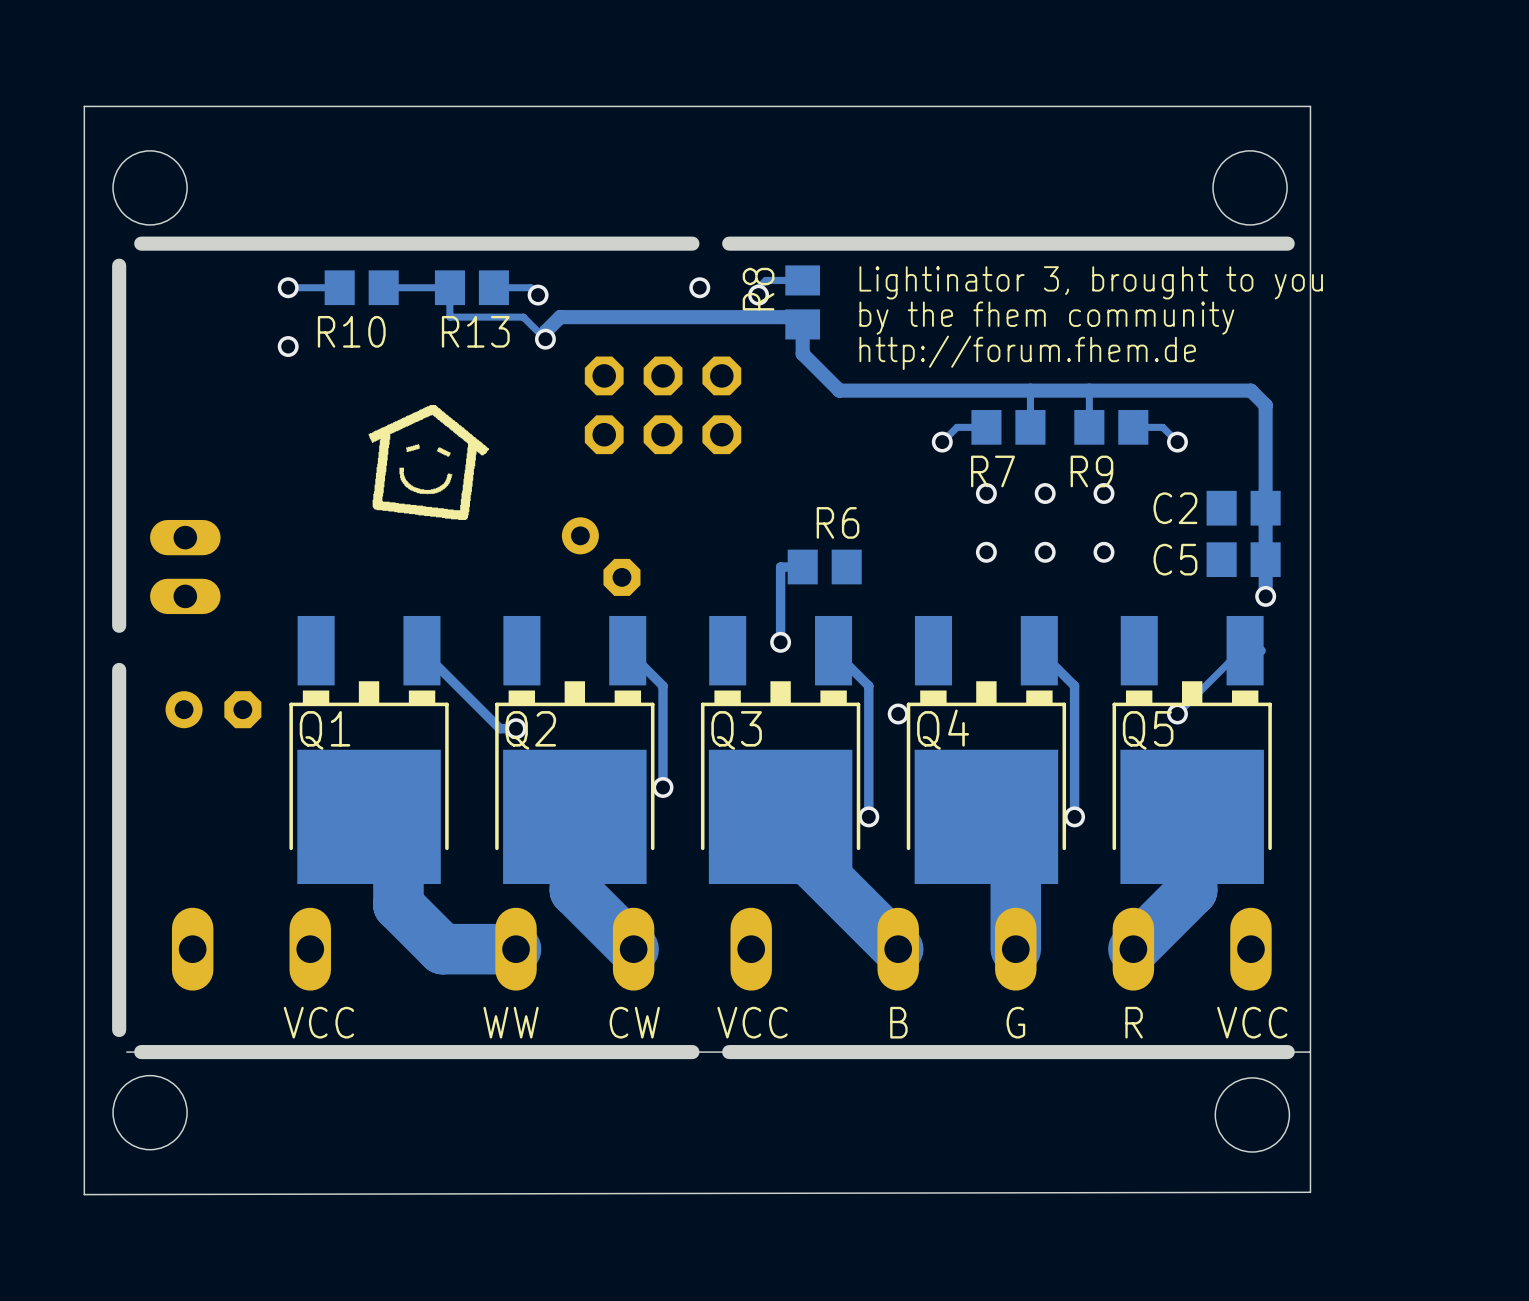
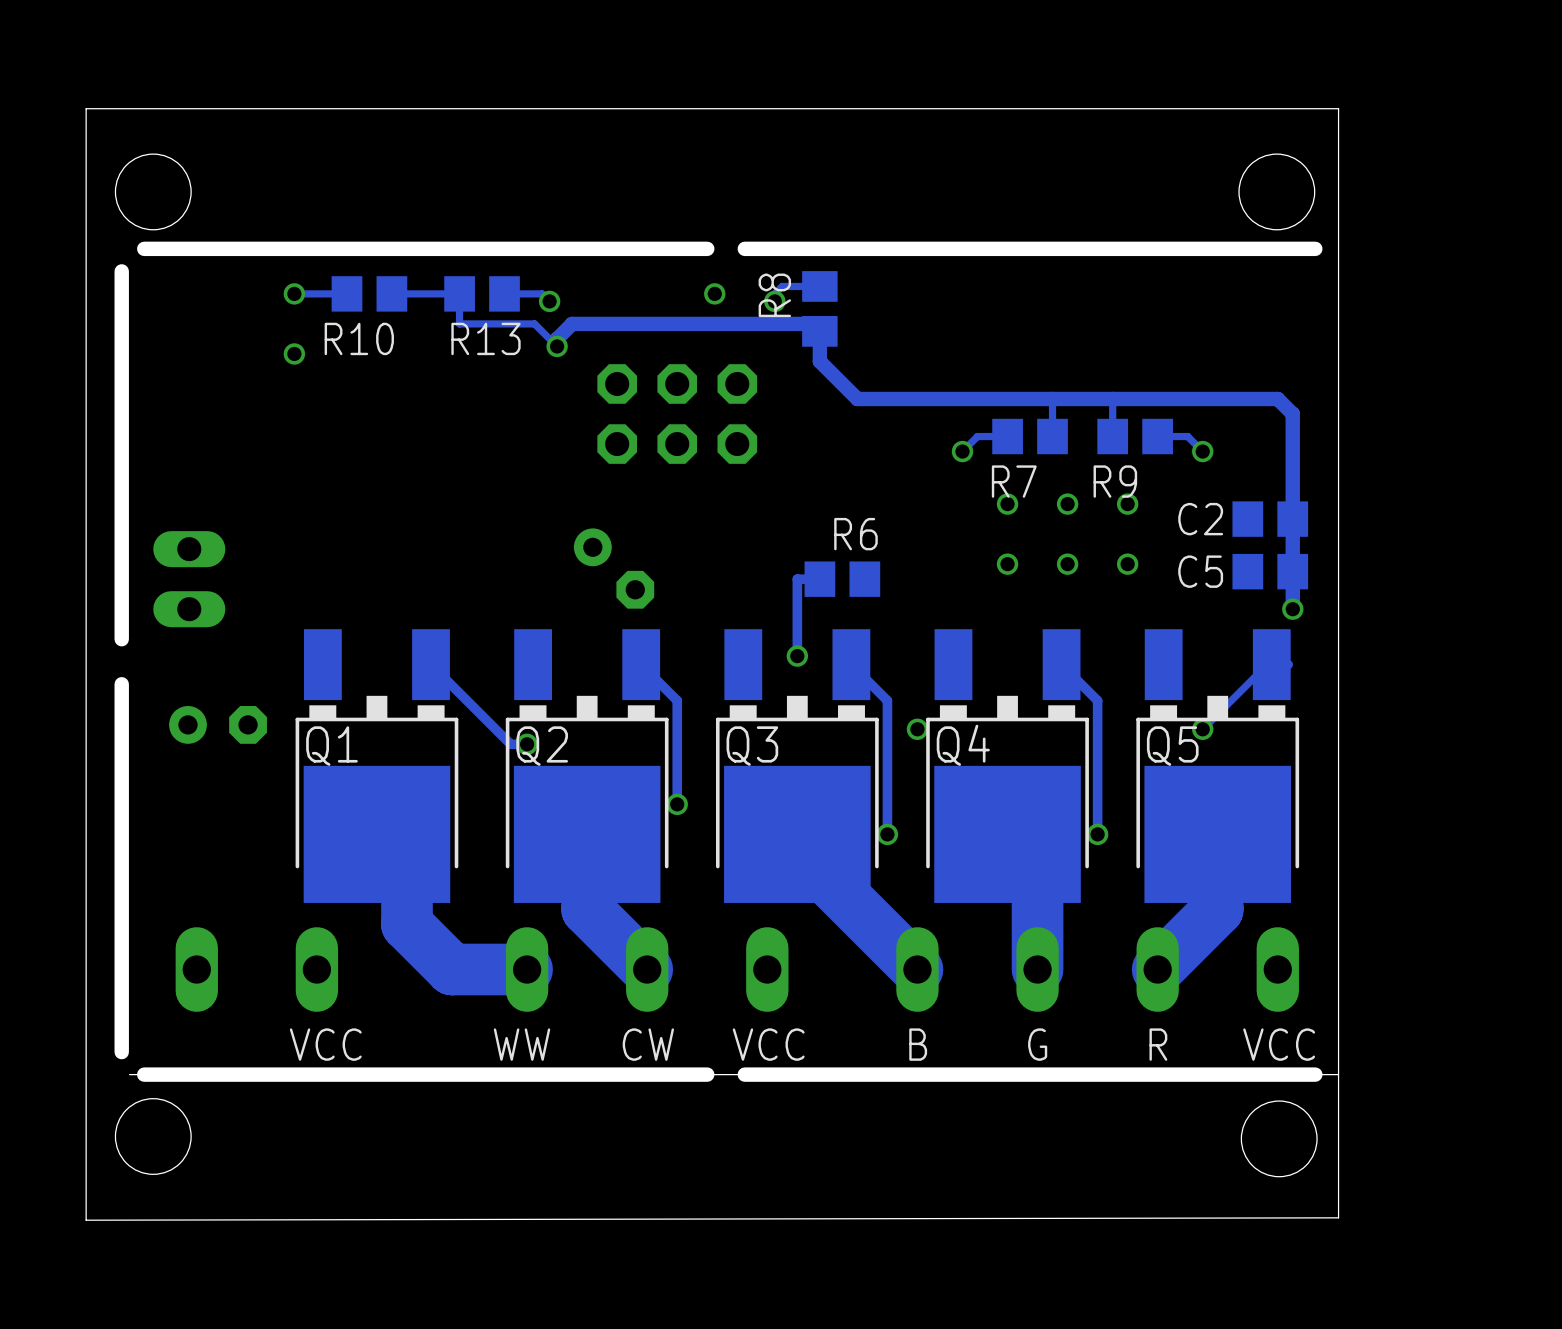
text: Lightinator 3, brought to you (1091, 282) -> none
text: by the fhem community (1046, 318) -> none
text: http://forum.fhem.de (1027, 352) -> none
drawing: [368, 404, 489, 520] -> none

